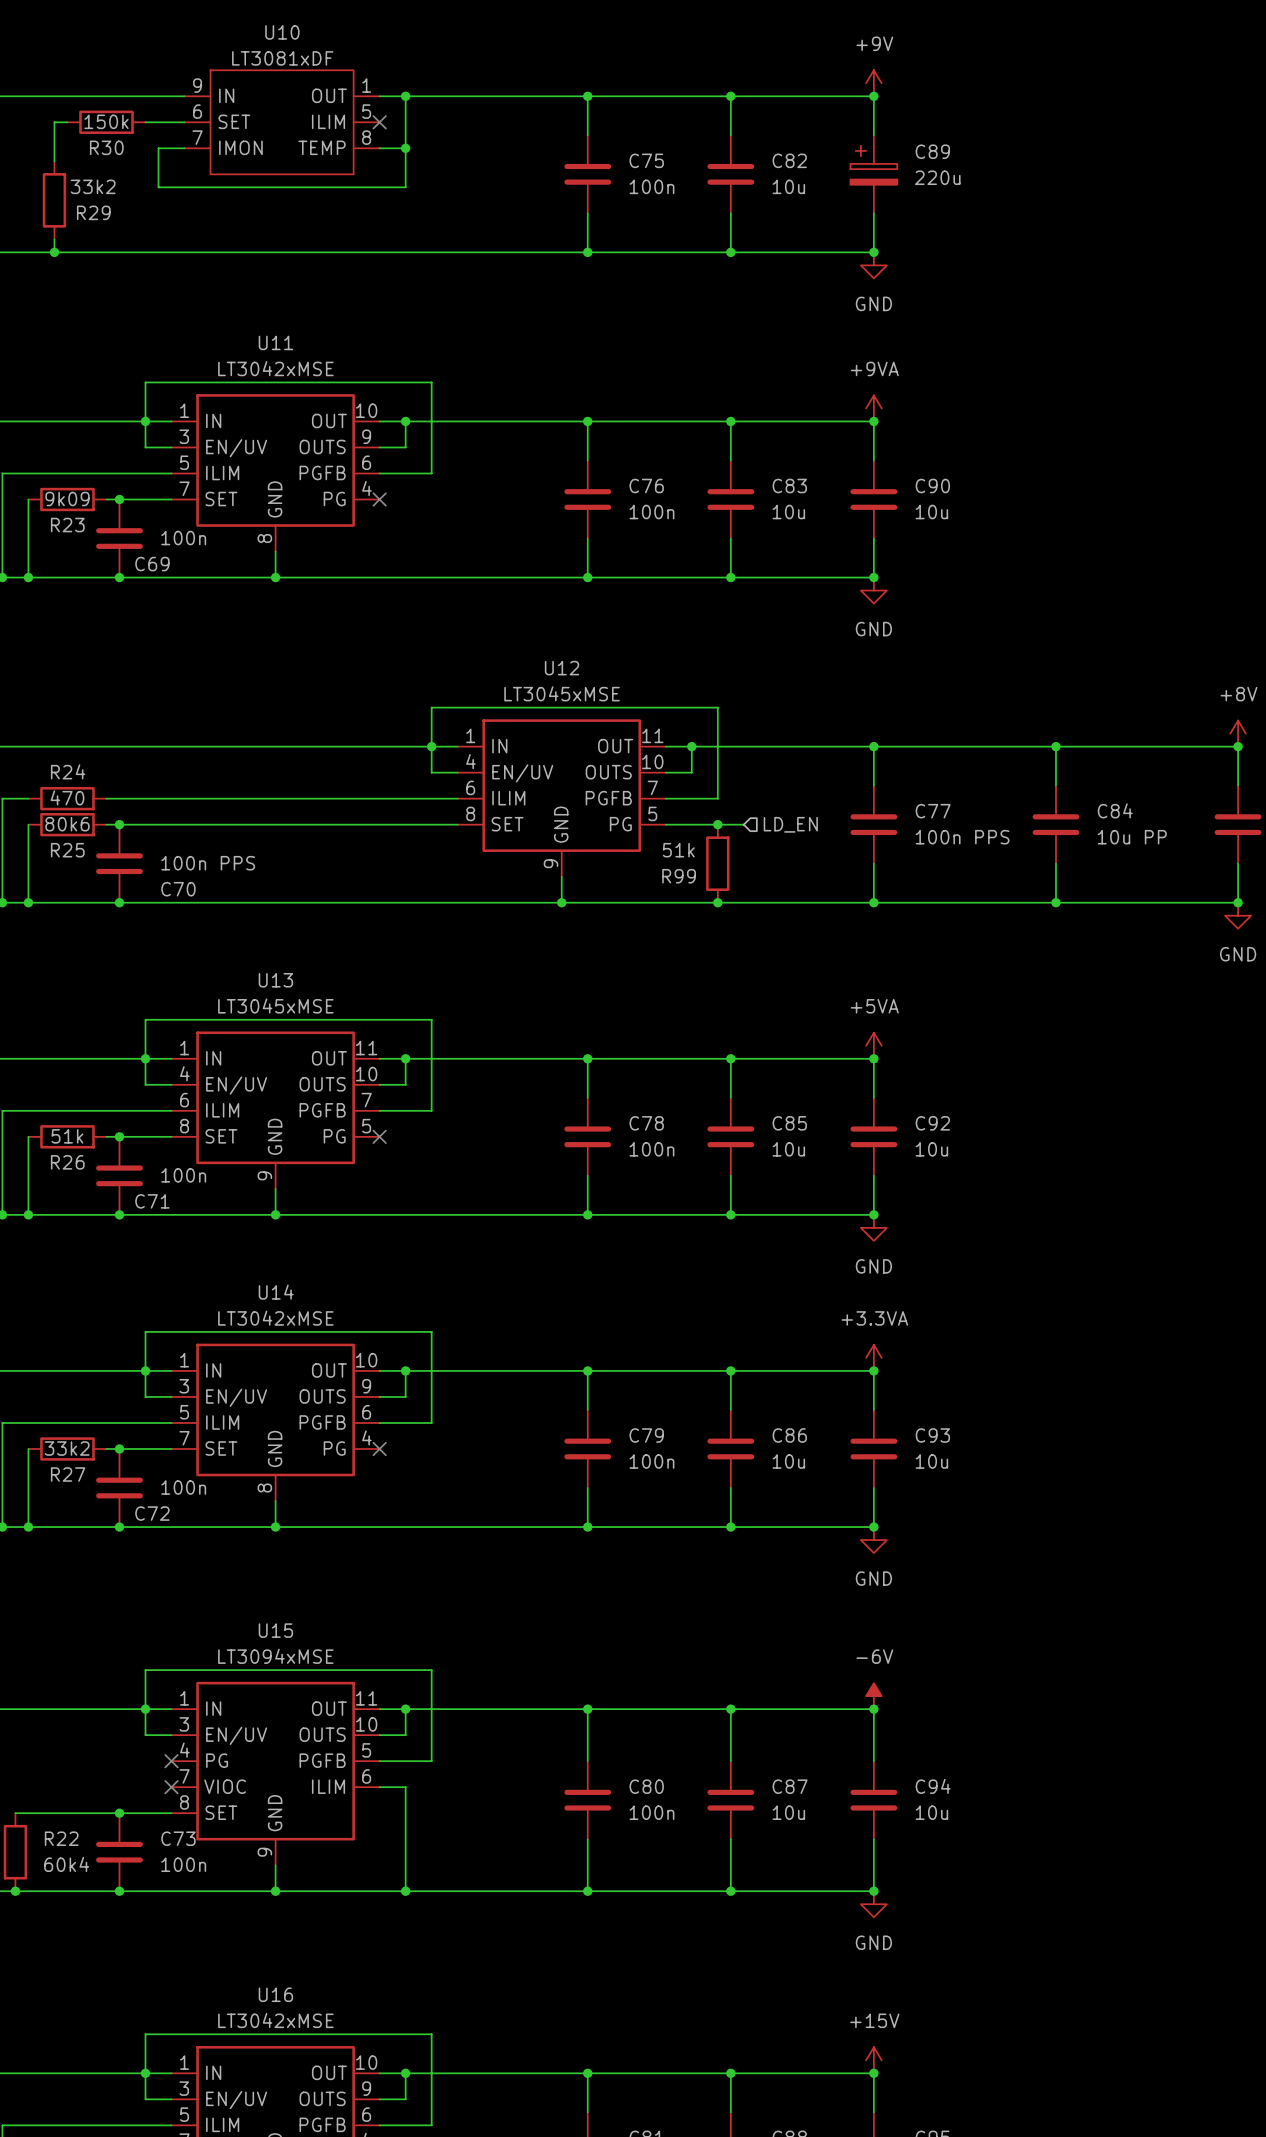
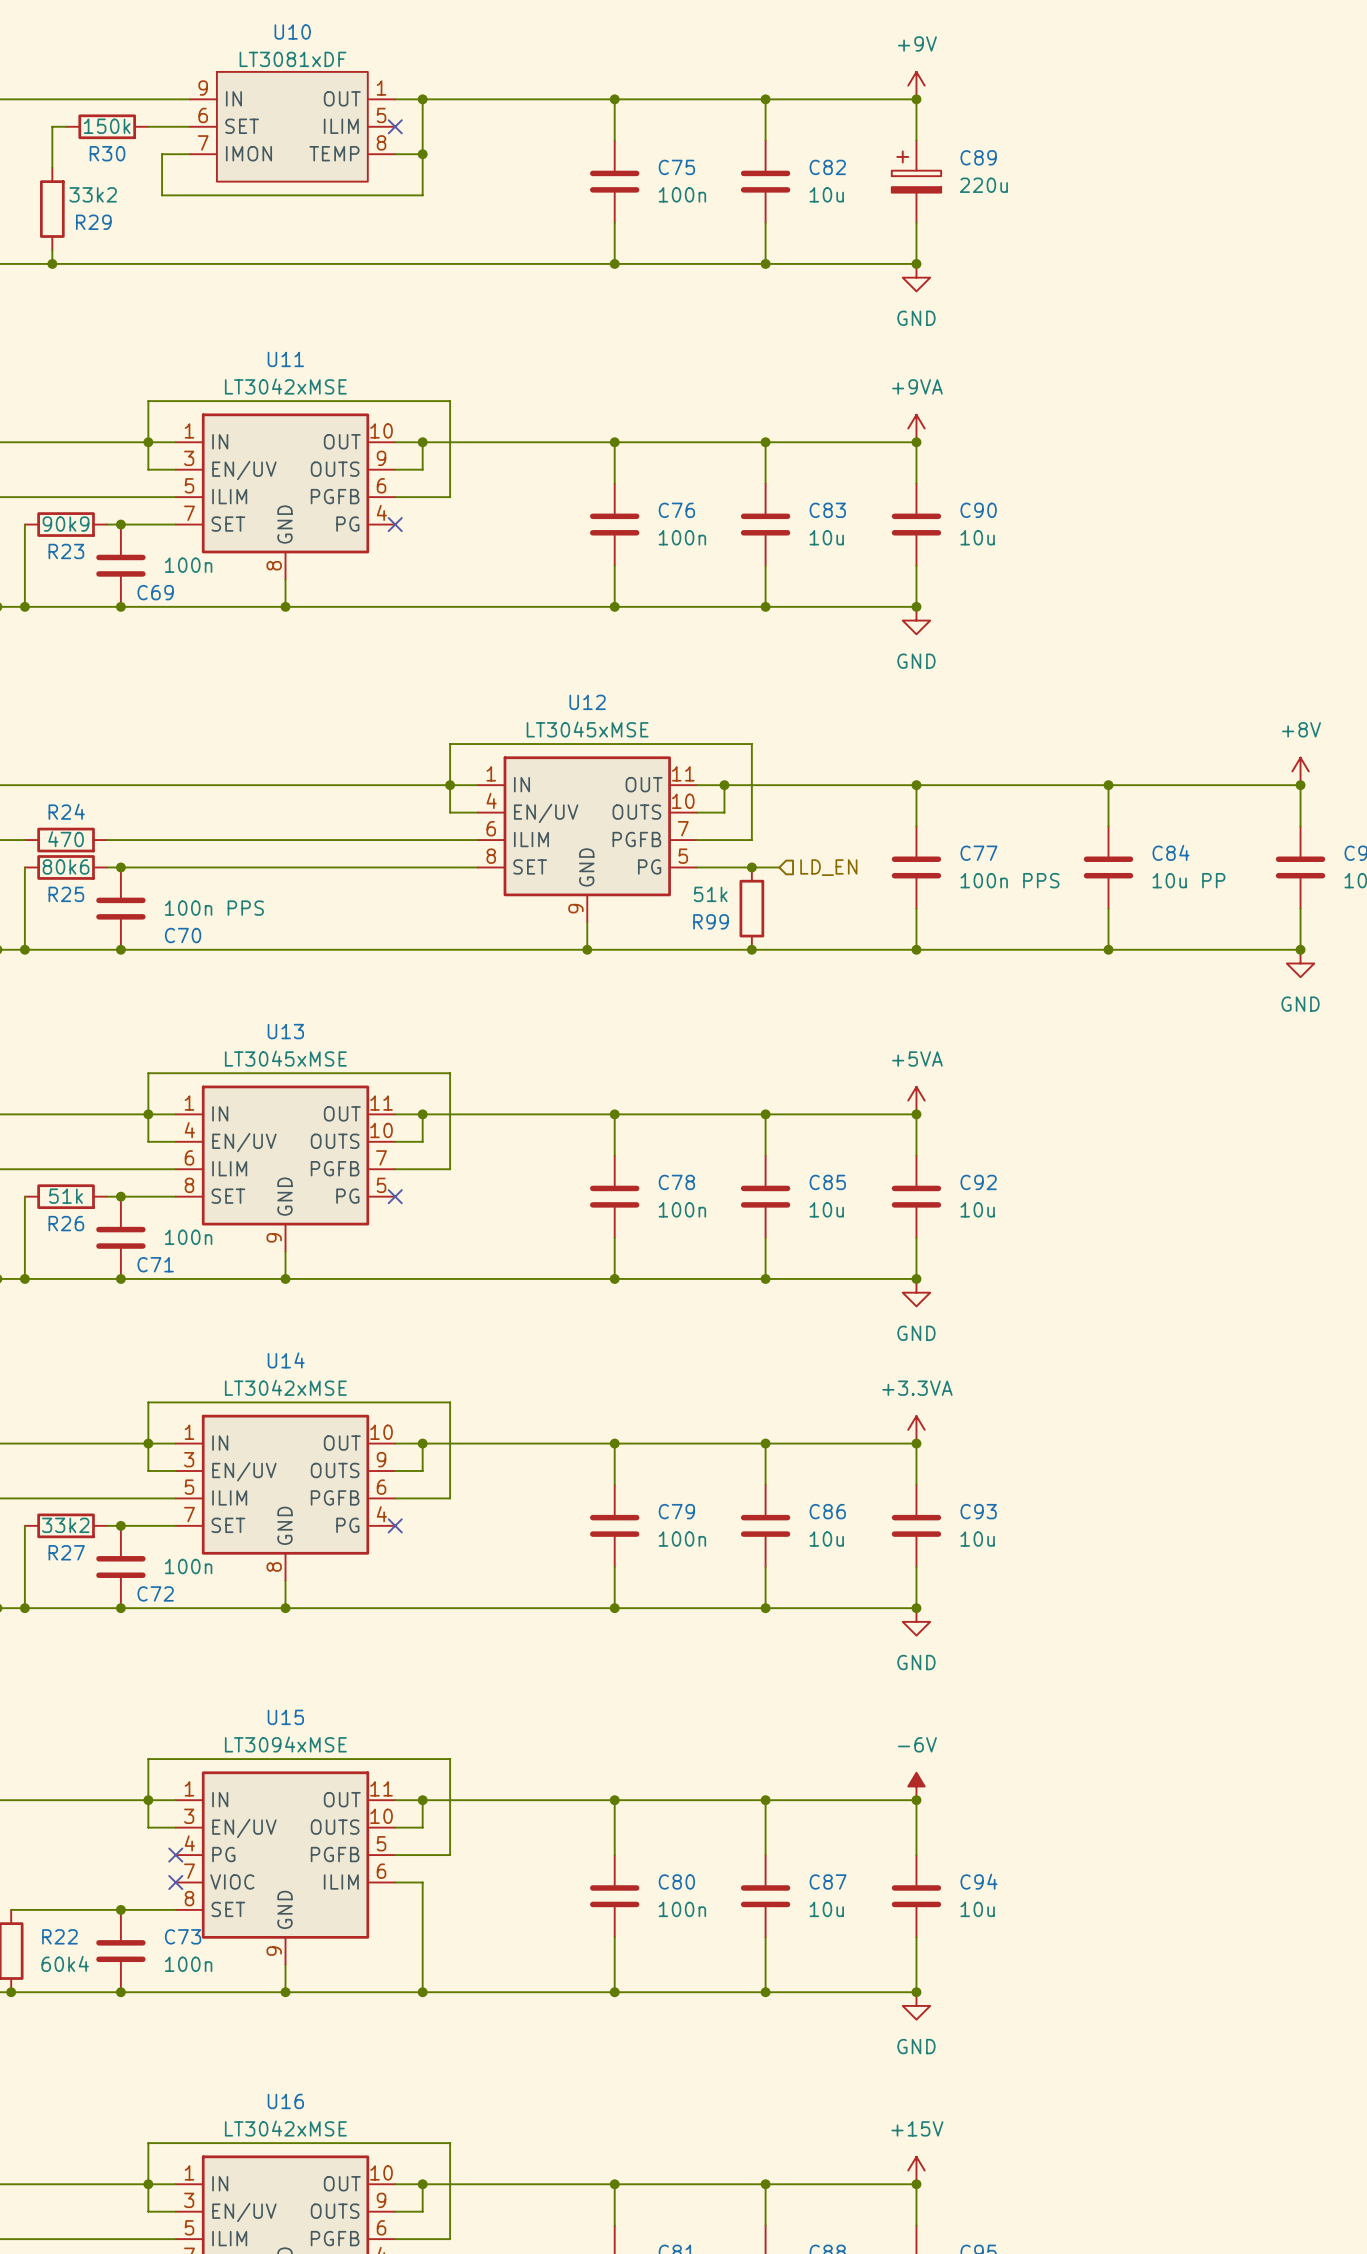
R23 value: 9k09 (67, 499) -> 90k9 (66, 524)

